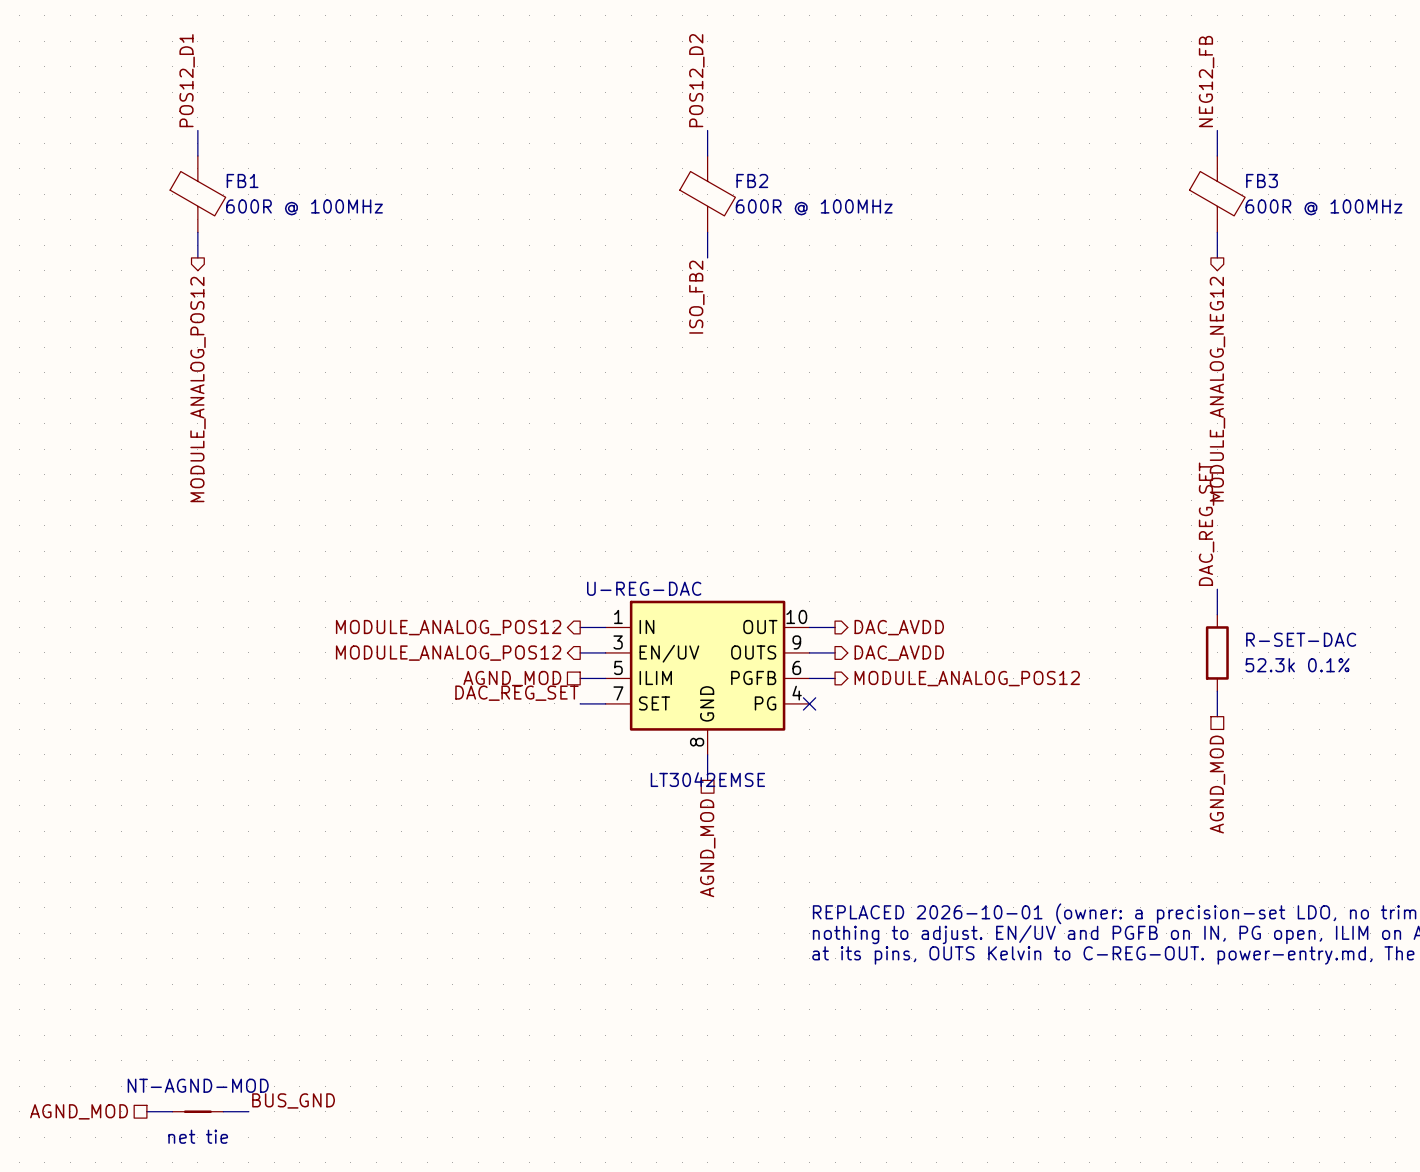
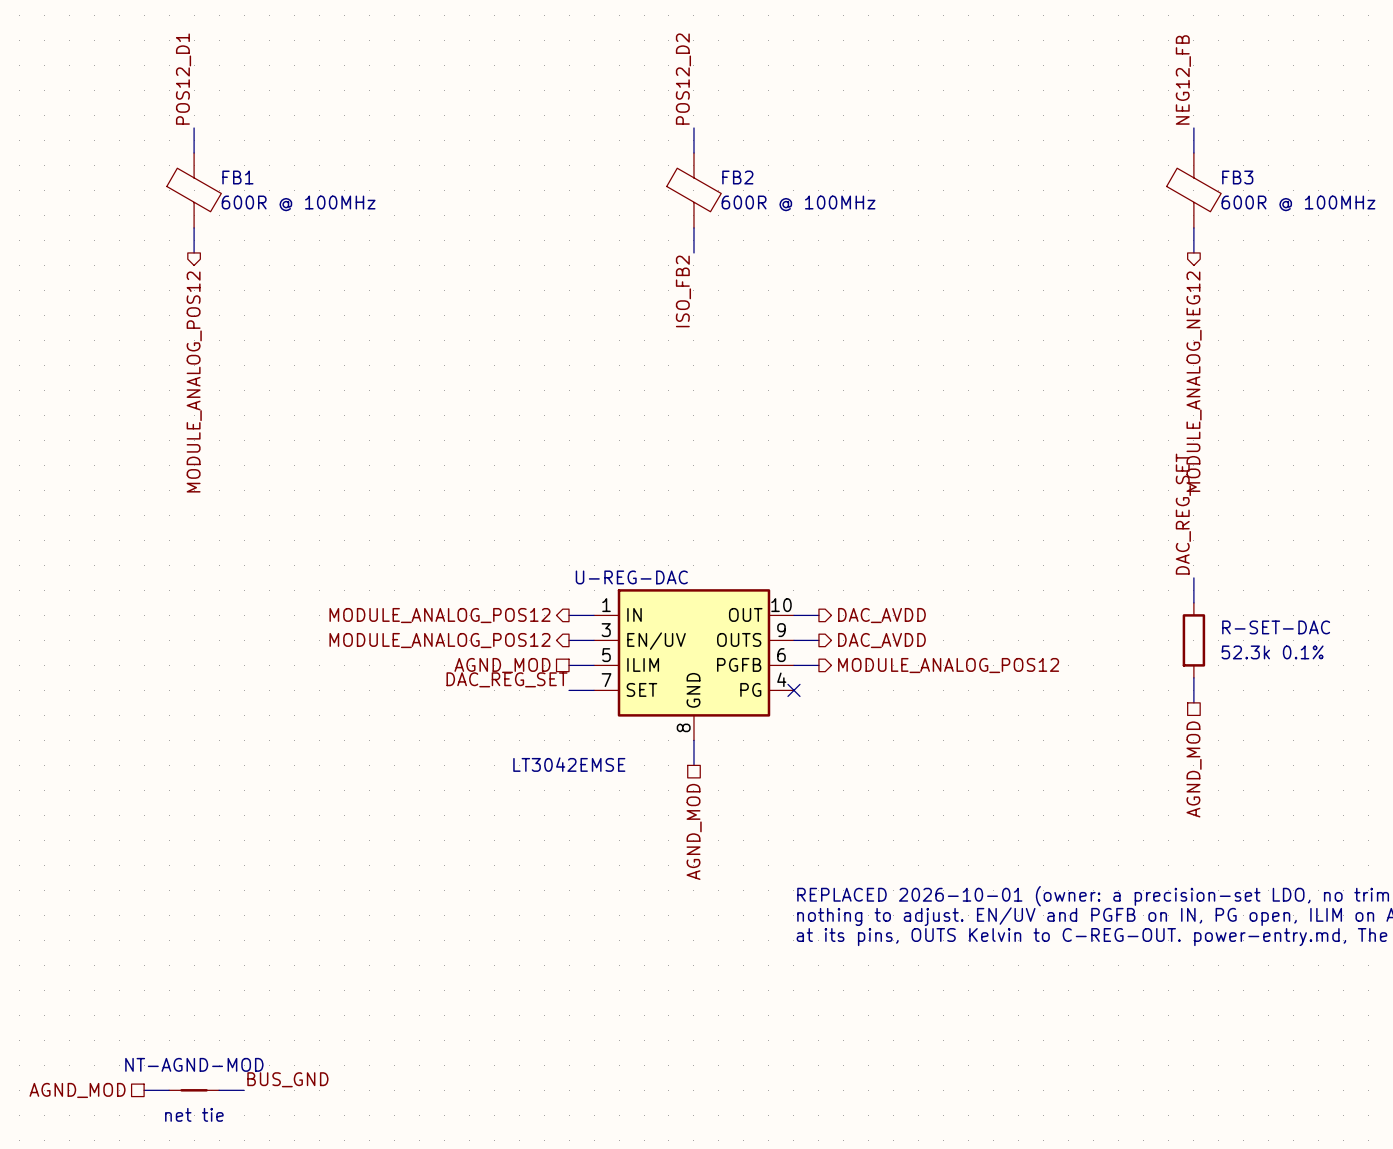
U-REG-DAC value position: LT3042EMSE (707, 779) -> LT3042EMSE (569, 764)

